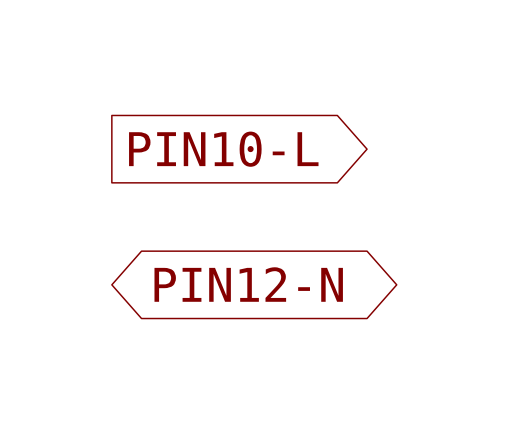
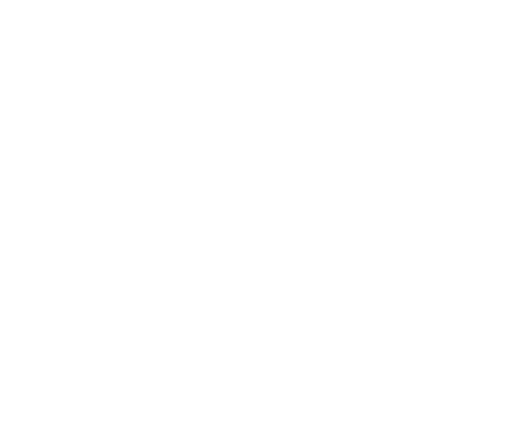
global label: PIN10-L (223, 149) -> none
global label: PIN12-N (248, 284) -> none

